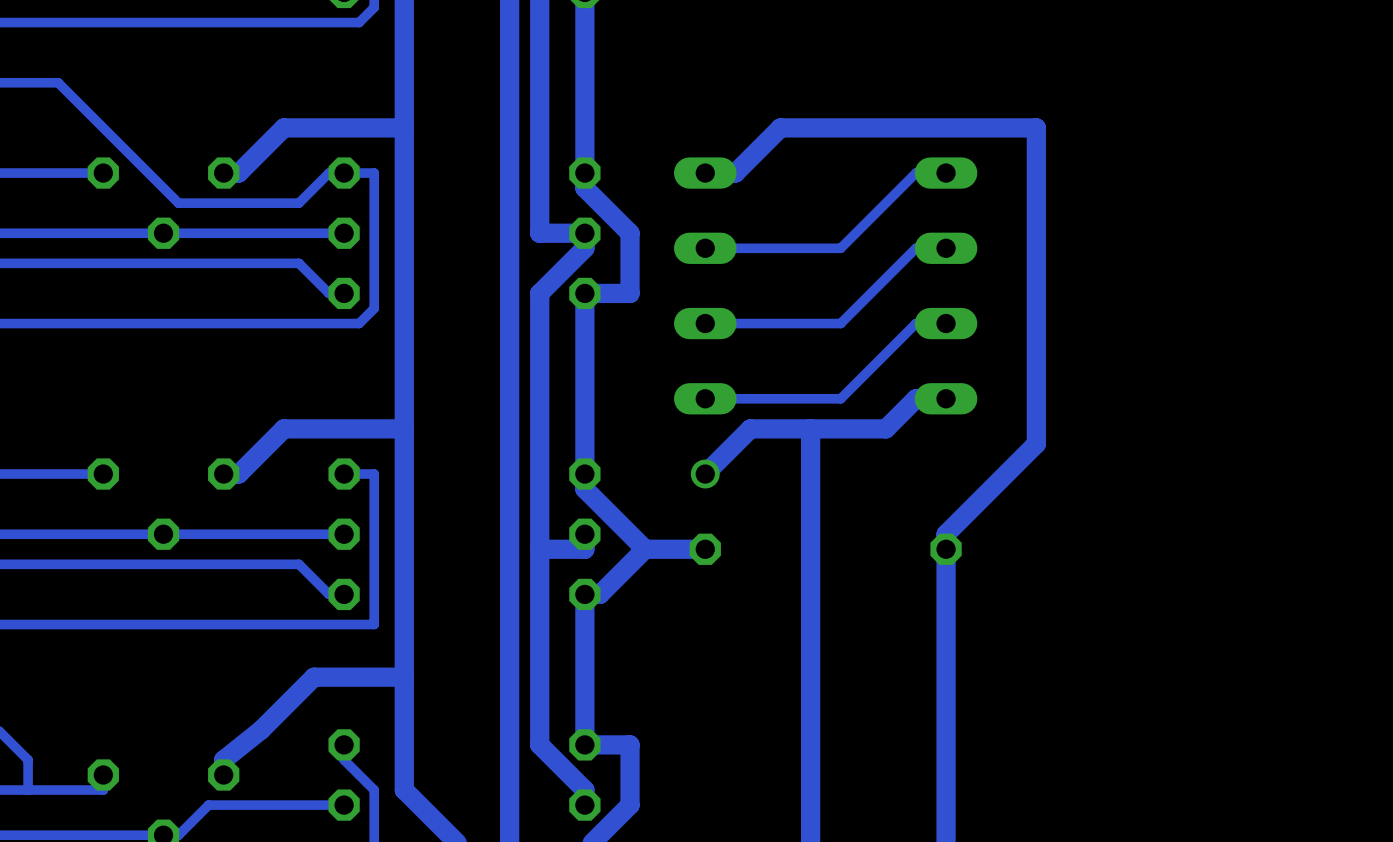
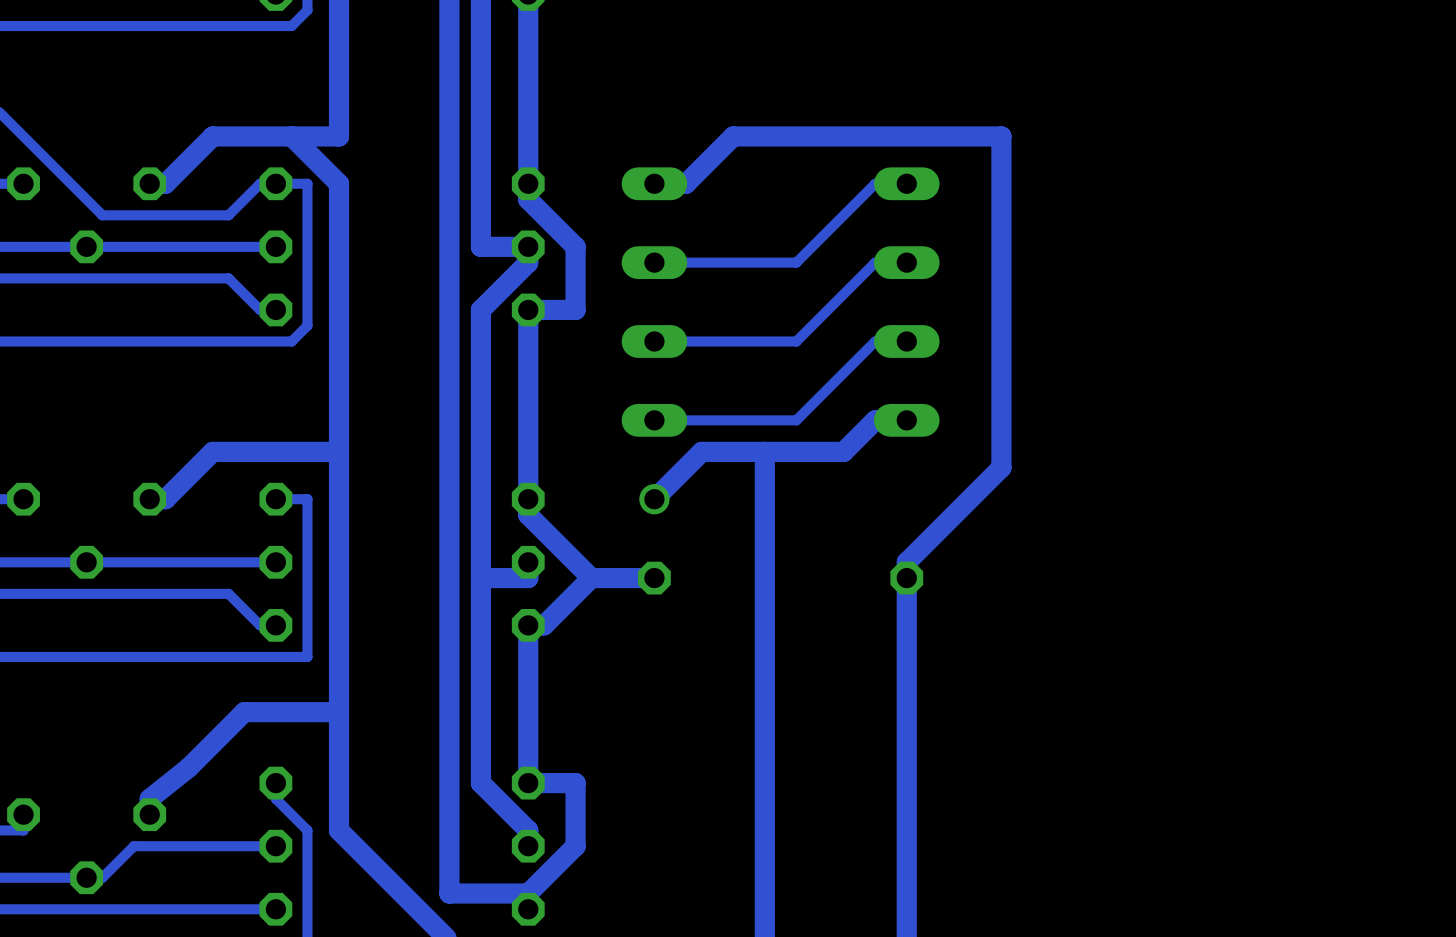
bottom track: (404, 127) (404, 173) -> (291, 136) (338, 183)

